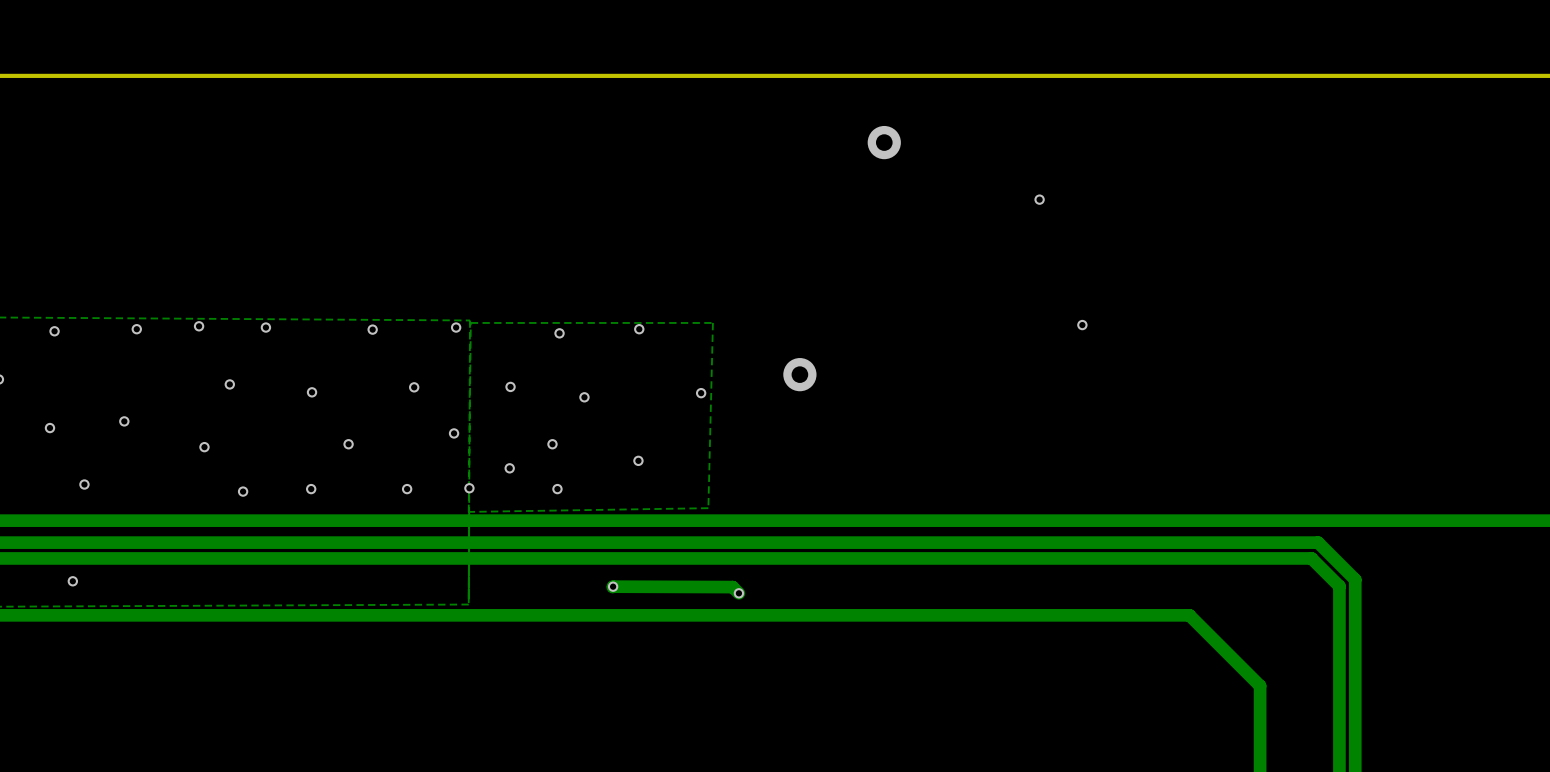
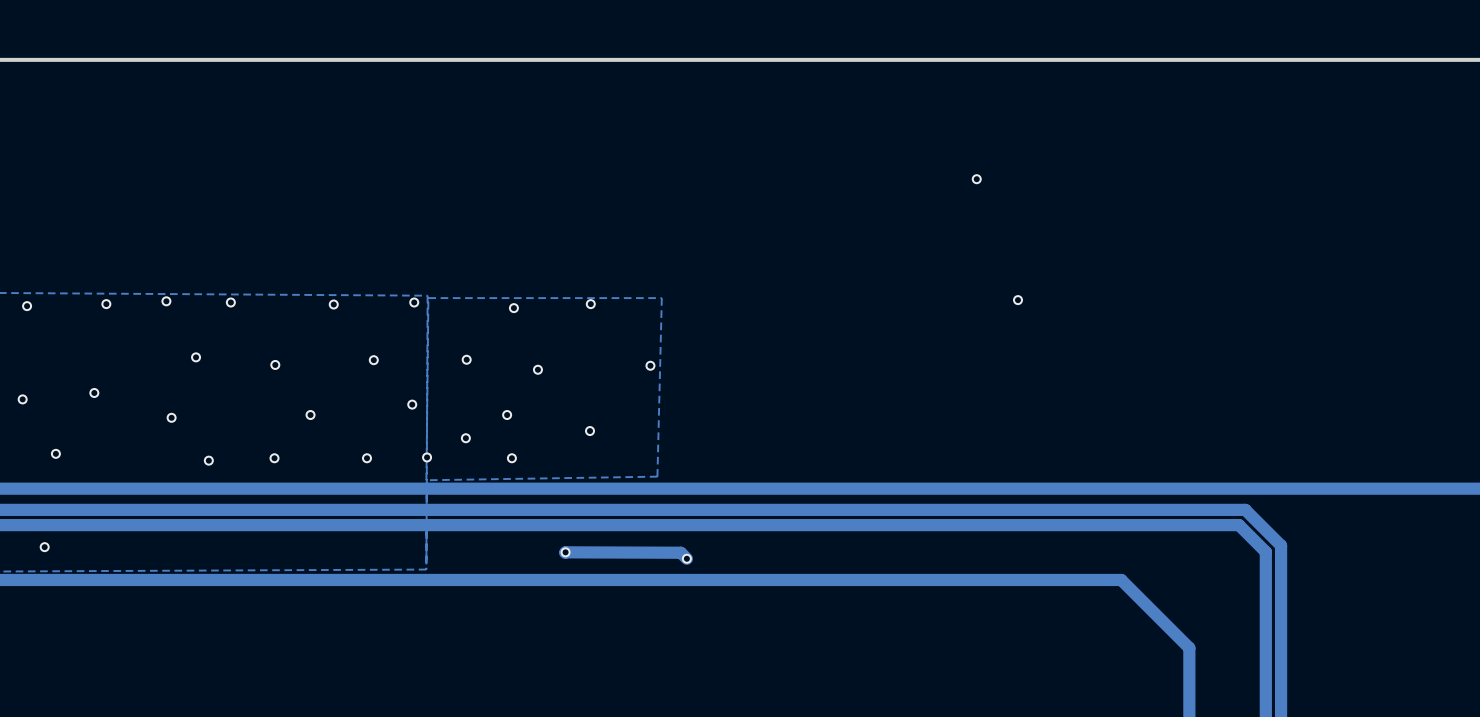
via: (884, 142) -> none
via: (799, 374) -> none

